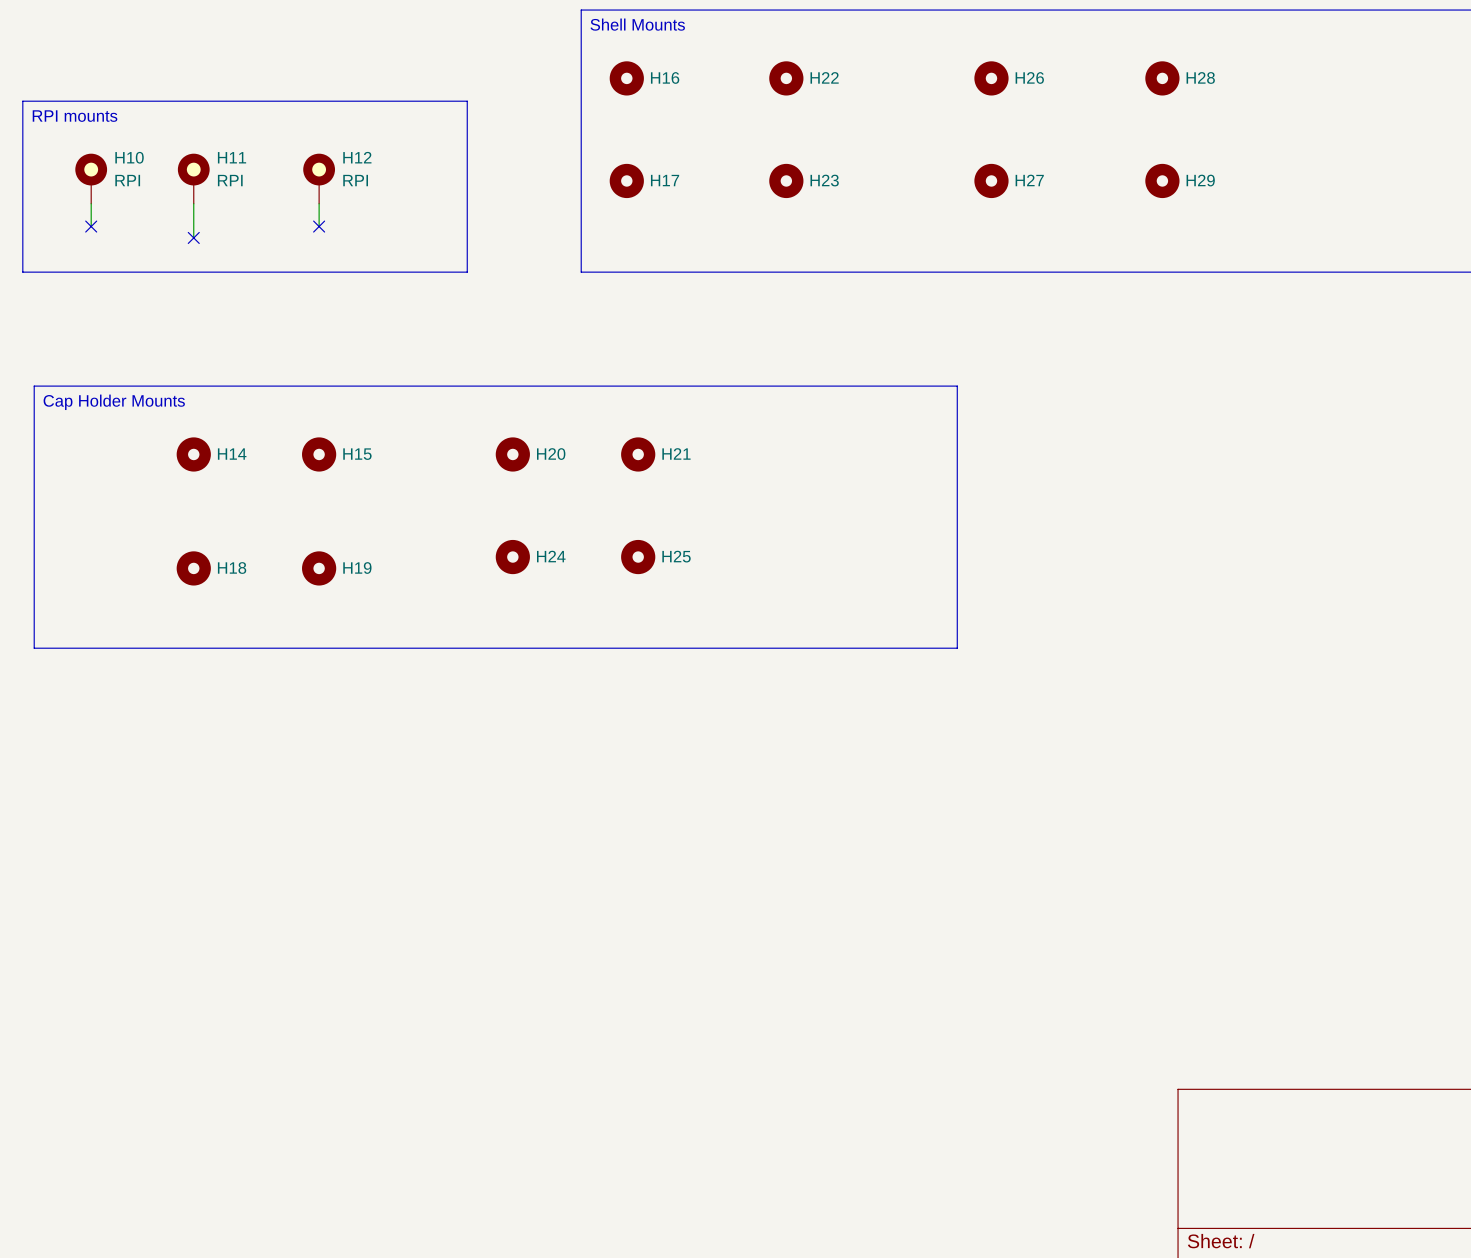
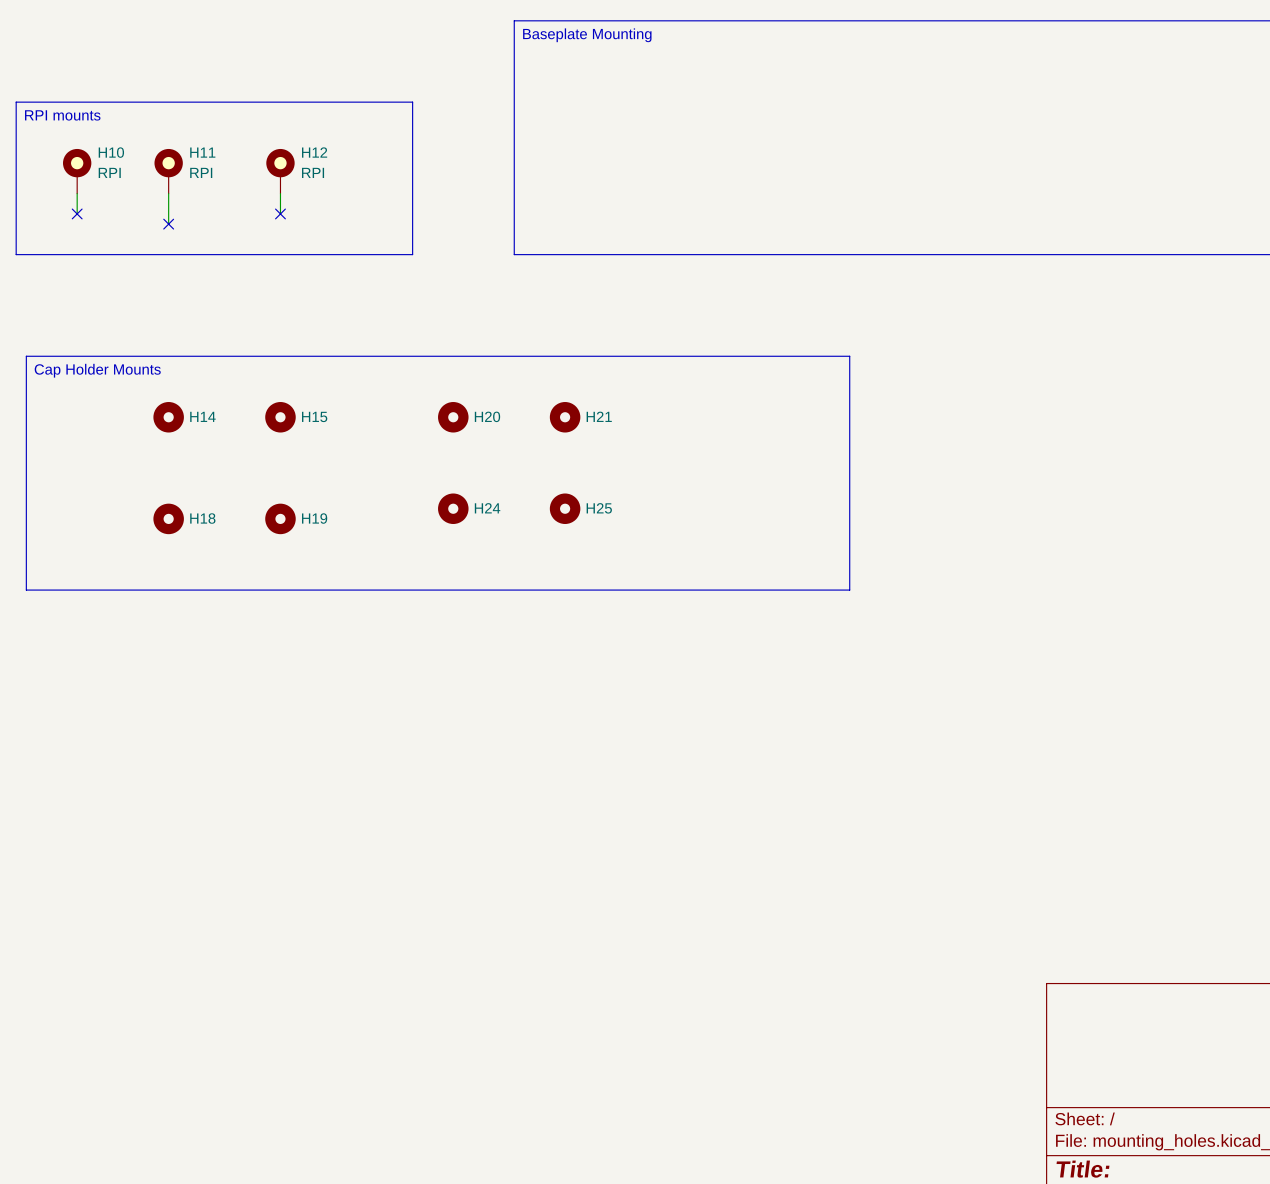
text: Shell Mounts (637, 24) -> Baseplate Mounting (587, 35)
H16: (626, 78) -> none
H22: (786, 78) -> none
H26: (991, 78) -> none
H28: (1162, 78) -> none
H17: (626, 180) -> none
H23: (786, 180) -> none
H27: (991, 180) -> none
H29: (1162, 180) -> none

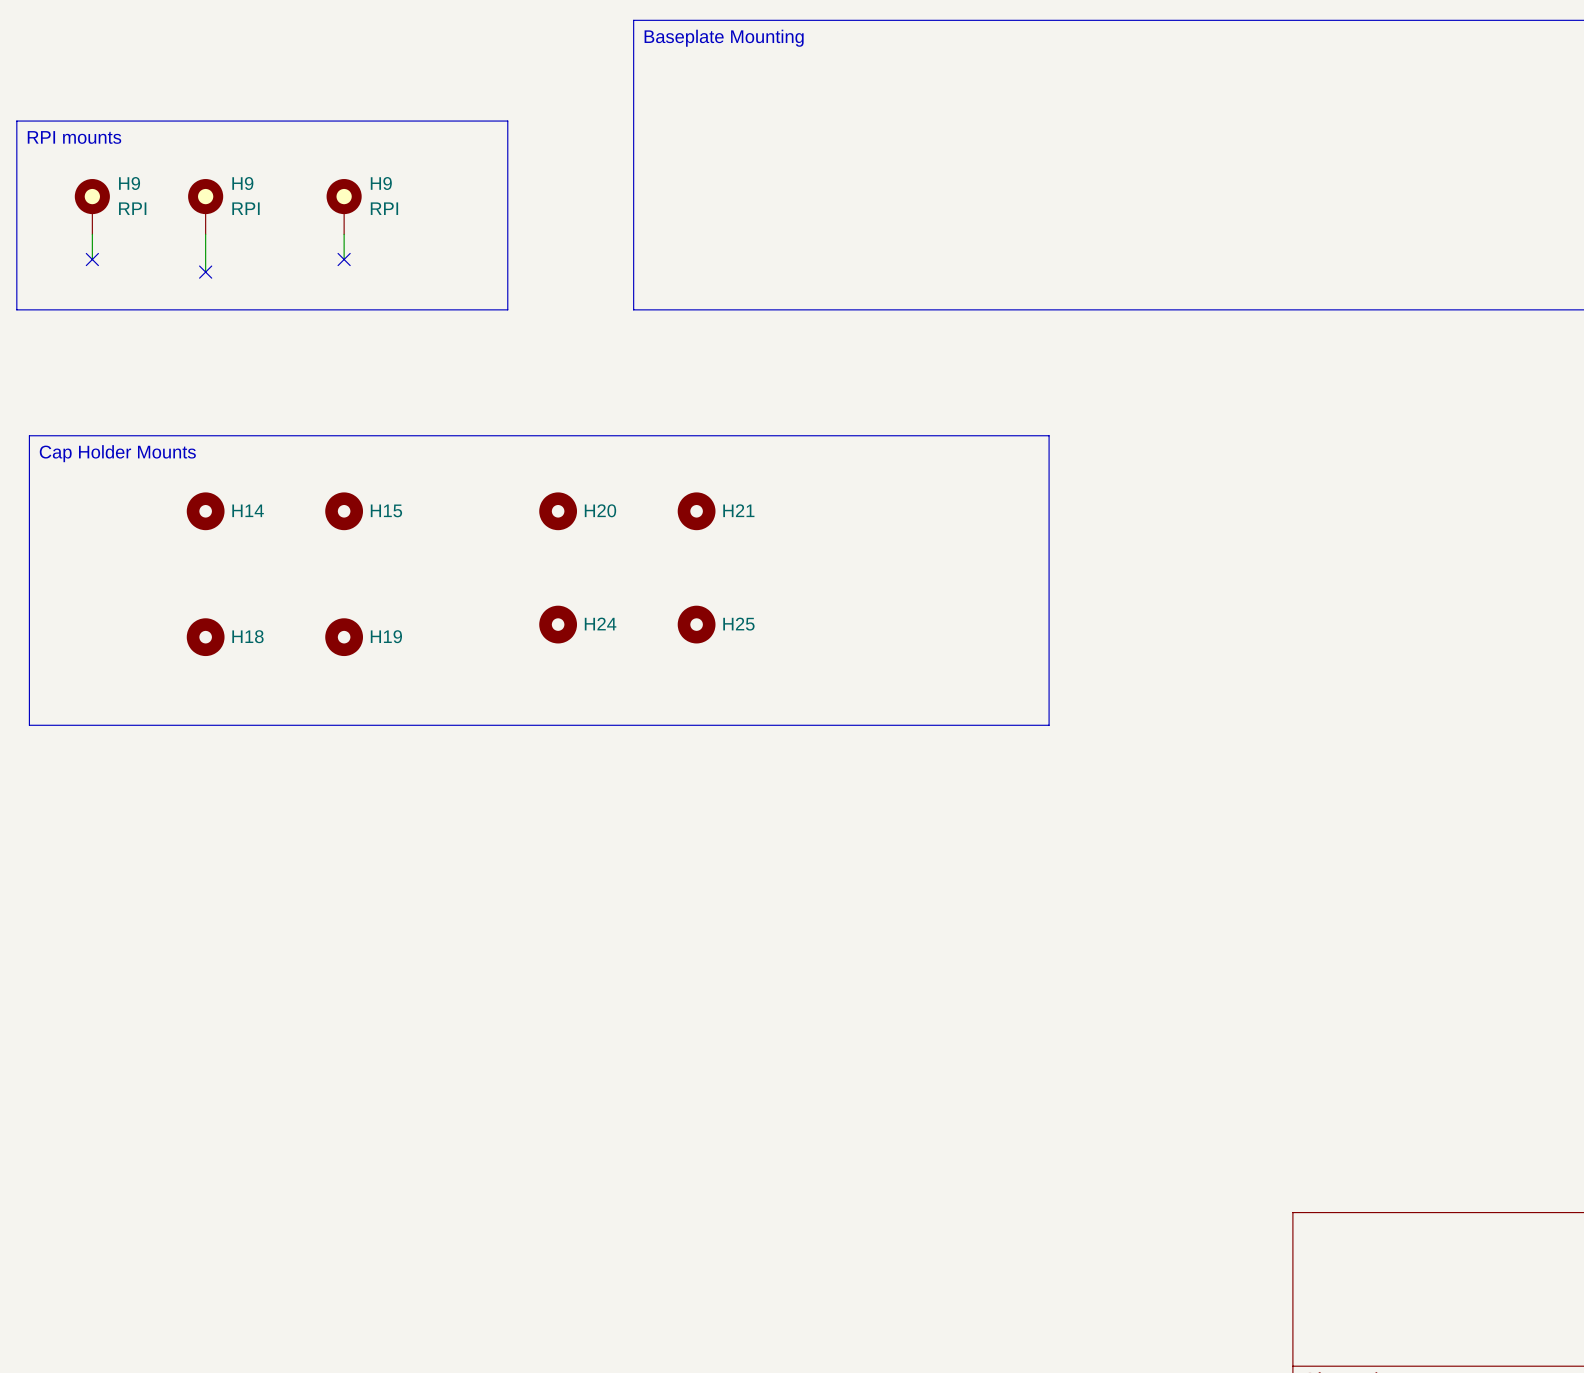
H10 name: H10 (111, 152) -> H9 (129, 183)
H11 name: H11 (202, 152) -> H9 (242, 183)
H12 name: H12 (314, 152) -> H9 (381, 183)

